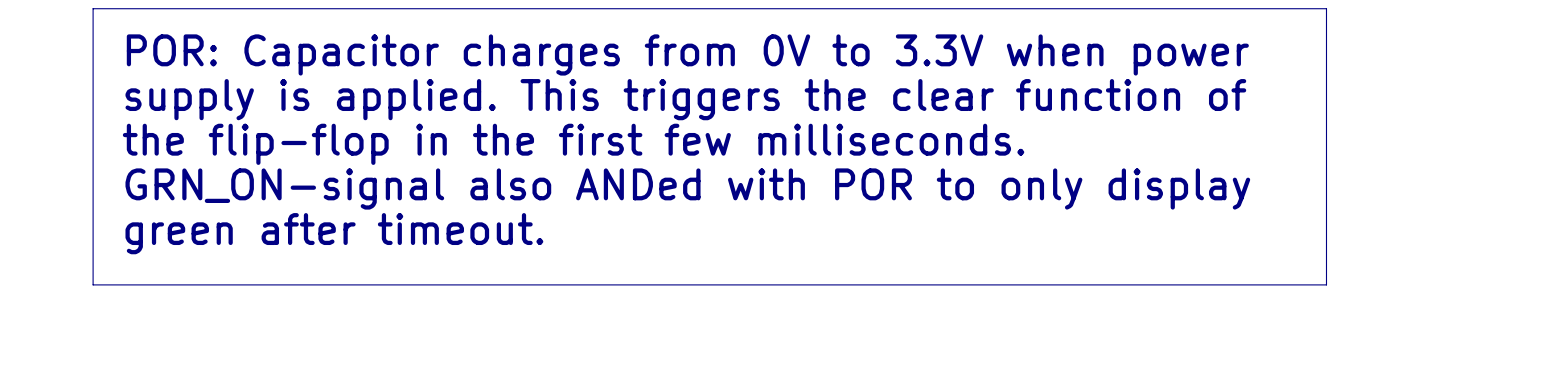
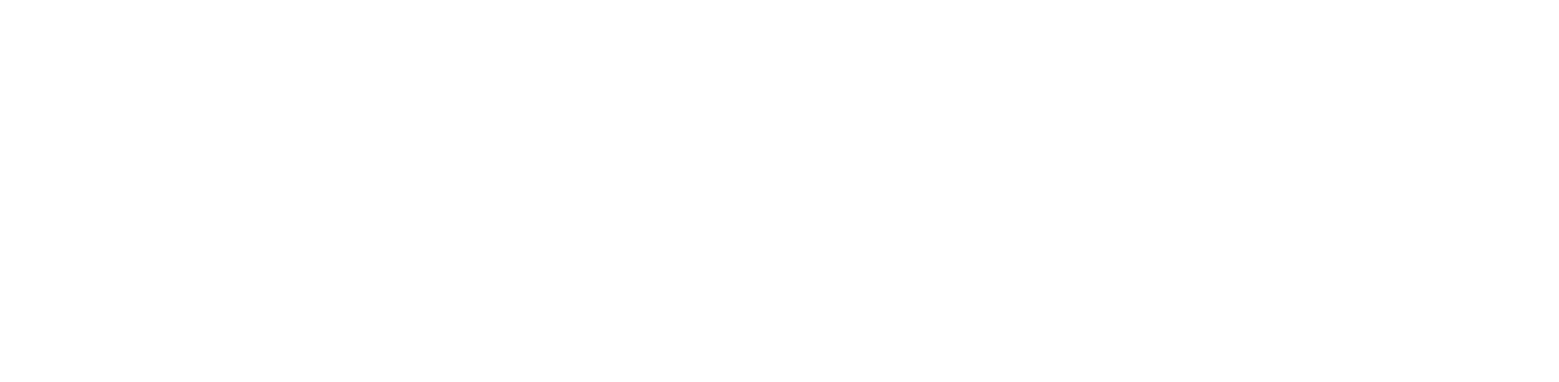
line: (93, 8) (1326, 8) (1326, 284) (93, 284) (93, 8) -> none
text: POR: Capacitor charges from 0V to 3.3V when power (687, 54) -> none
text: supply is applied. This triggers the clear function of (685, 99) -> none
text: the flip-flop in the first few milliseconds. (573, 144) -> none
text: GRN_ON-signal also ANDed with POR to only display (687, 188) -> none
text: green after timeout. (334, 233) -> none

